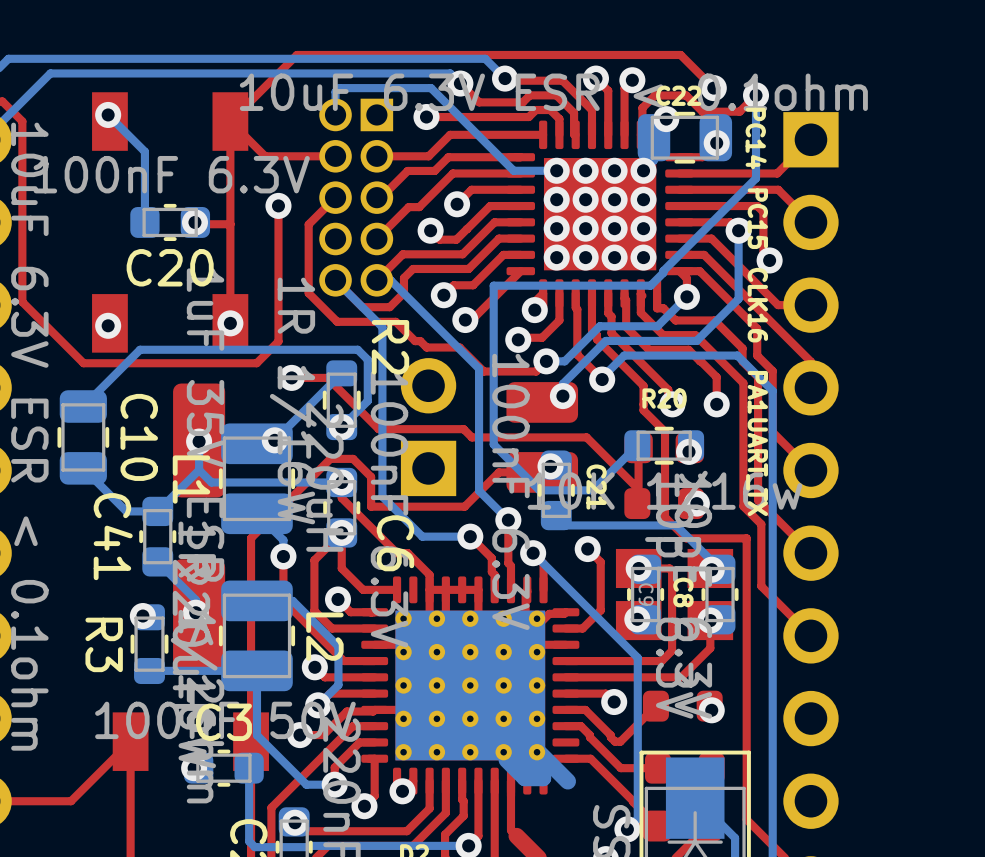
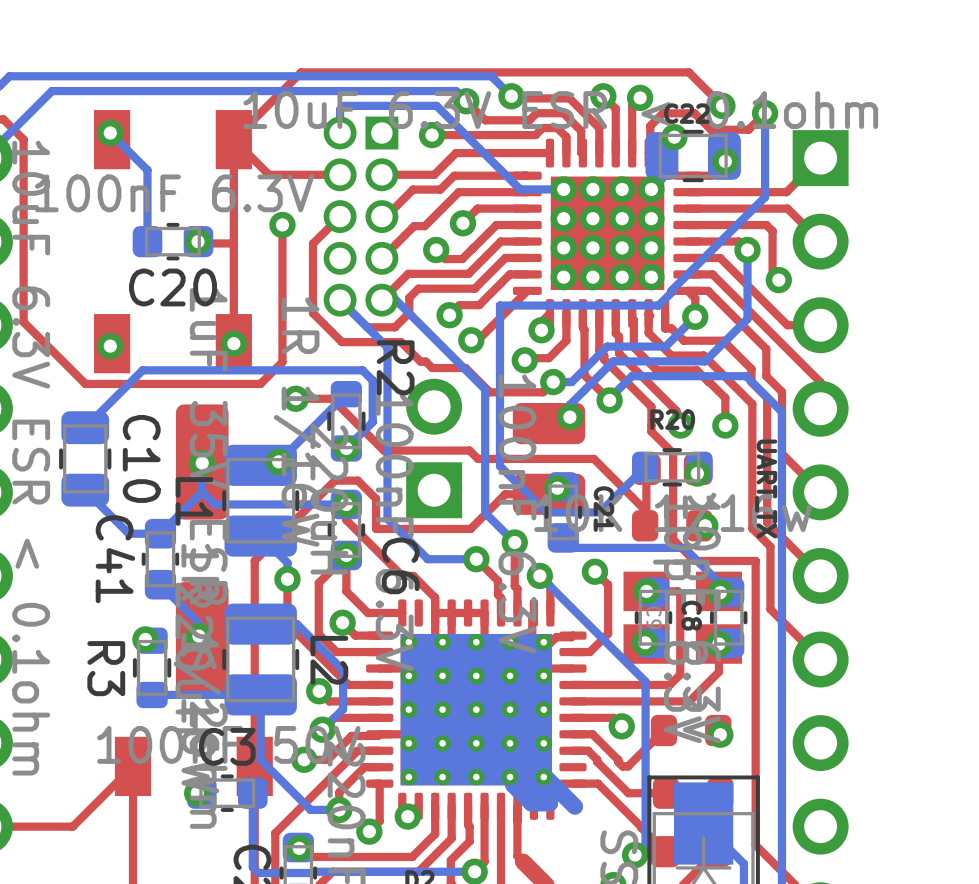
text: PC14 (756, 138) -> none
text: PC15 (757, 218) -> none
text: CLK16 (757, 305) -> none
text: PA1 (757, 392) -> none

